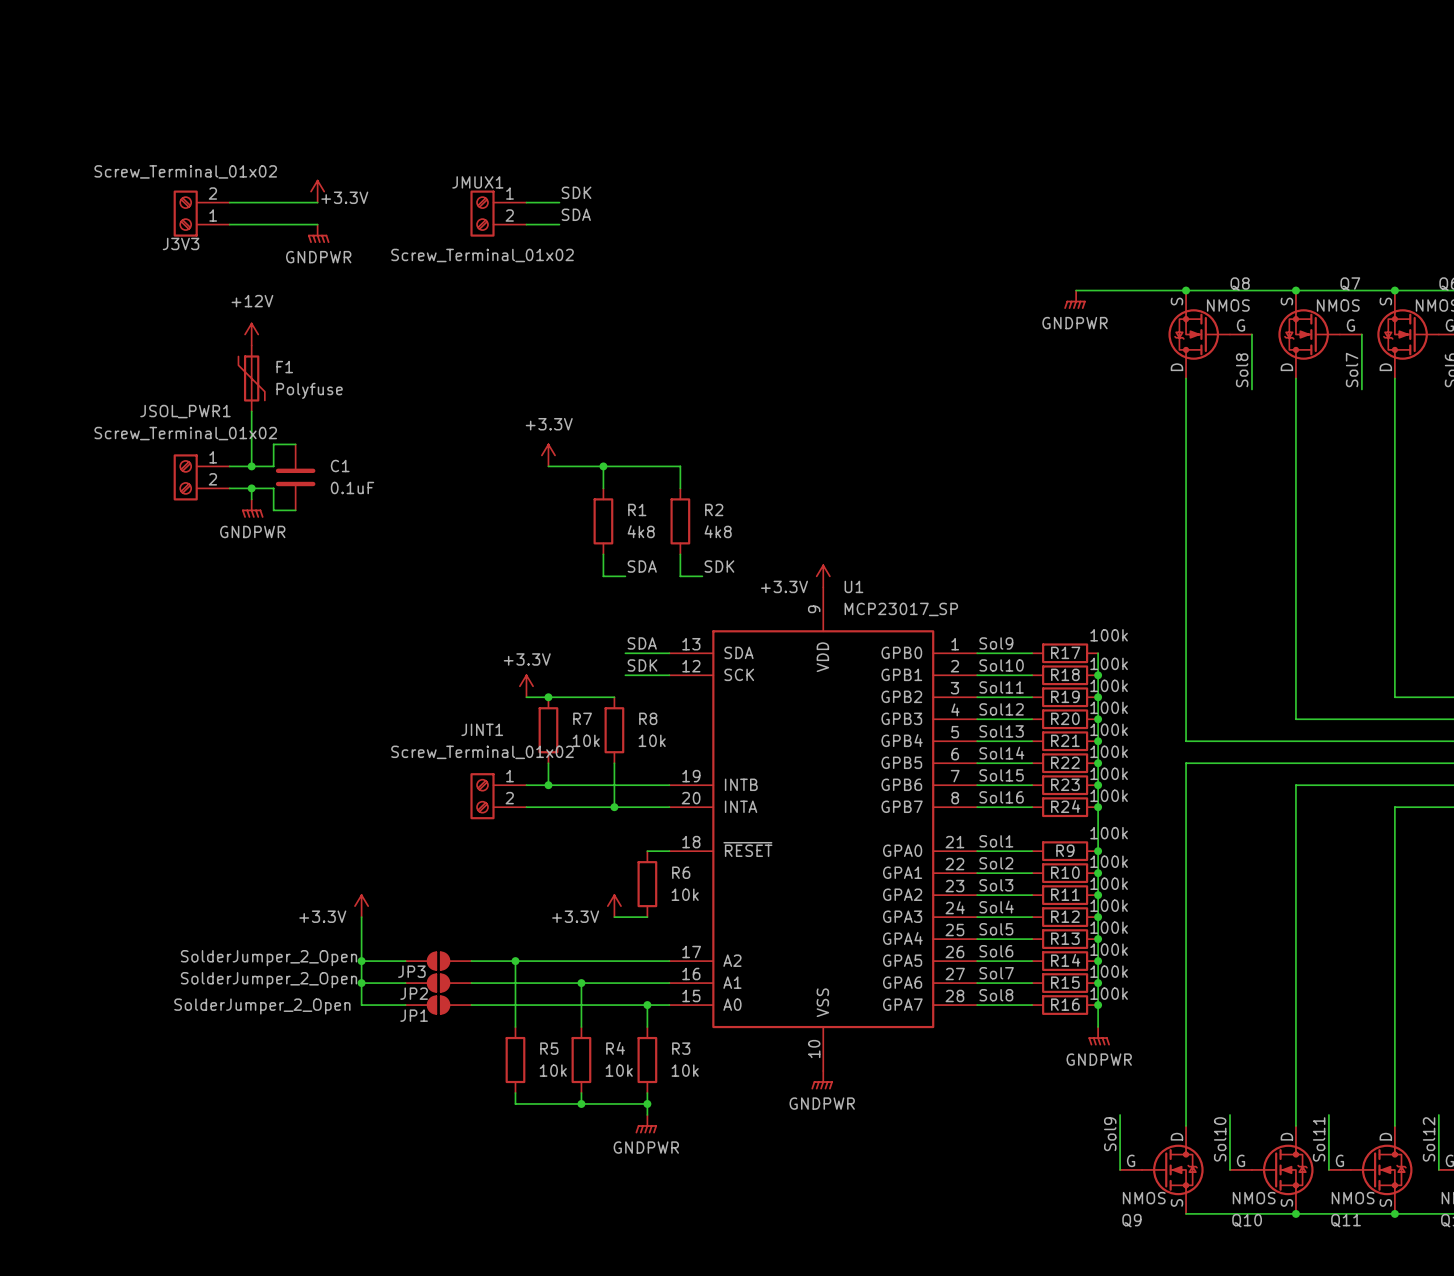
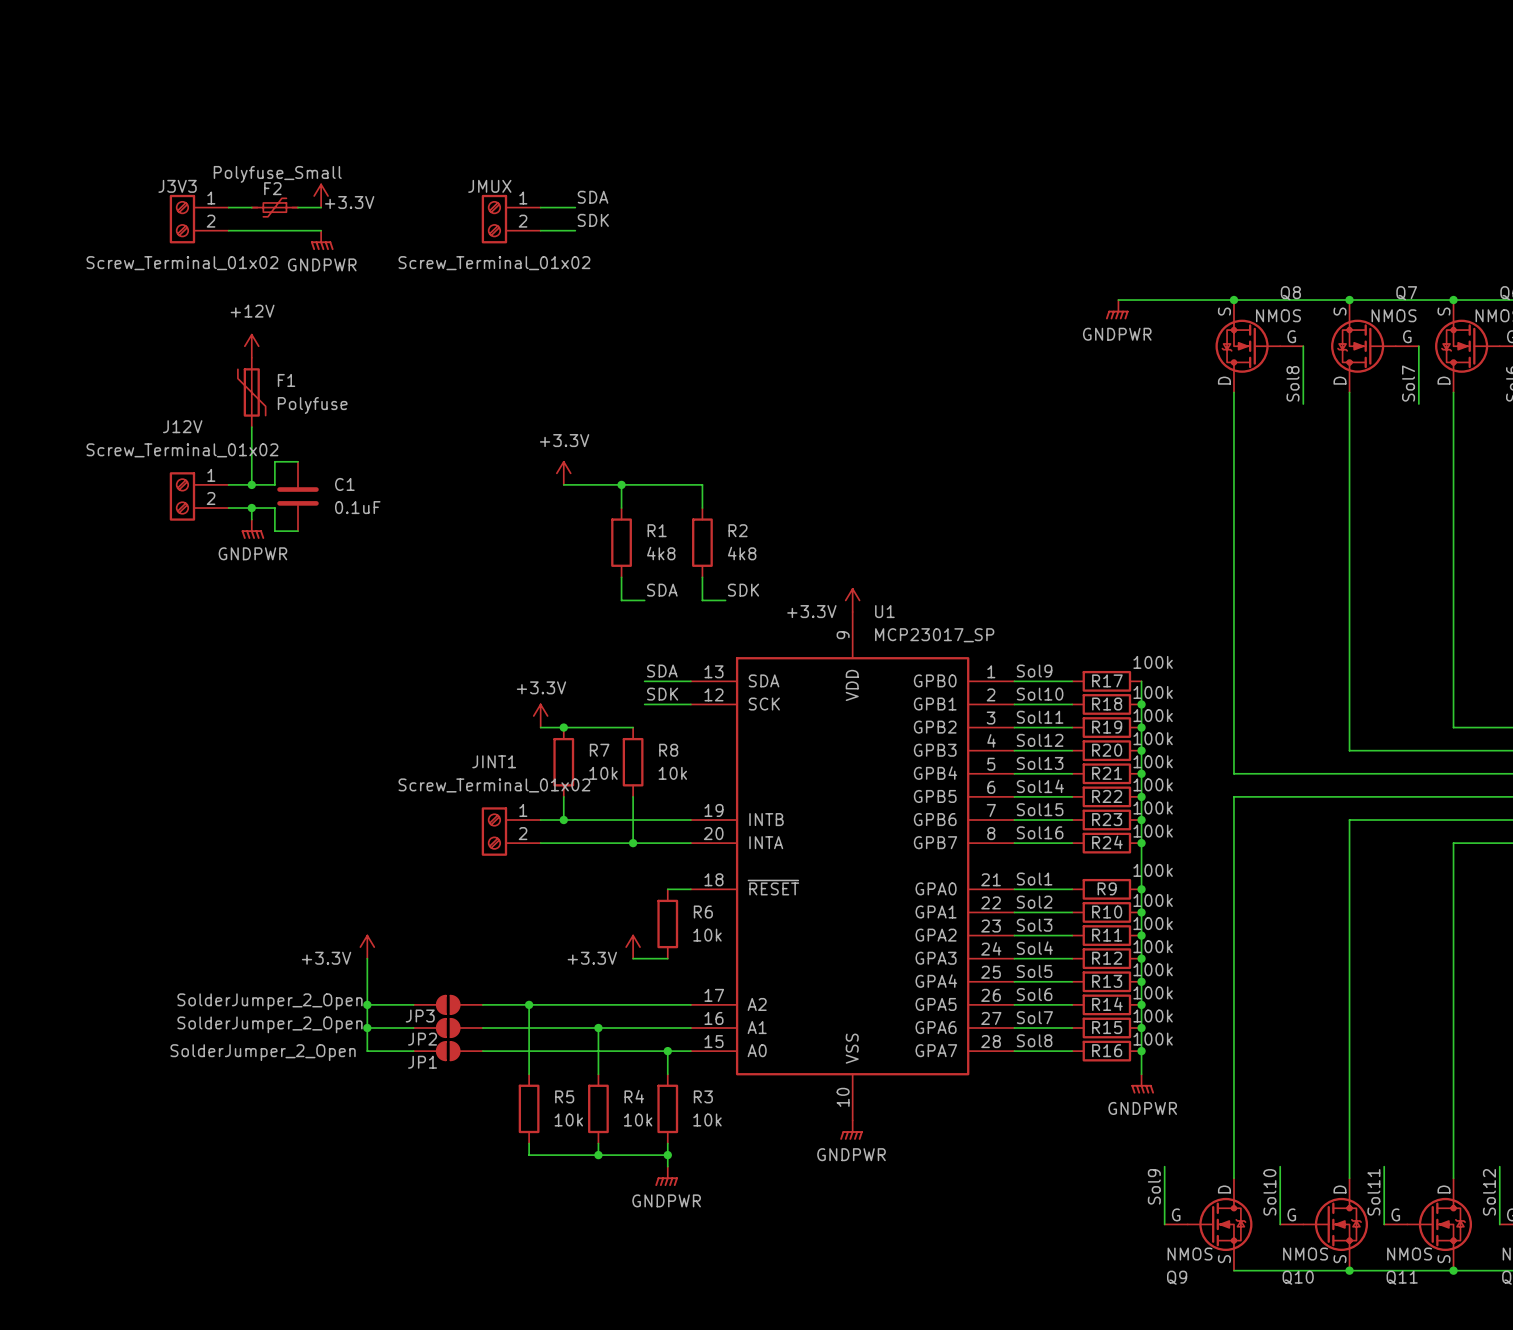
JMUX1 name: JMUX1 (477, 182) -> JMUX (489, 186)
label: SDK (576, 192) -> SDA (593, 197)
F2: none -> Polyfuse_Small (274, 207)
J3V3 flip: as is (185, 213) -> up-down (182, 219)
label: SDA (576, 214) -> SDK (593, 220)
JSOL_PWR1 name: JSOL_PWR1 (185, 411) -> J12V (182, 426)

